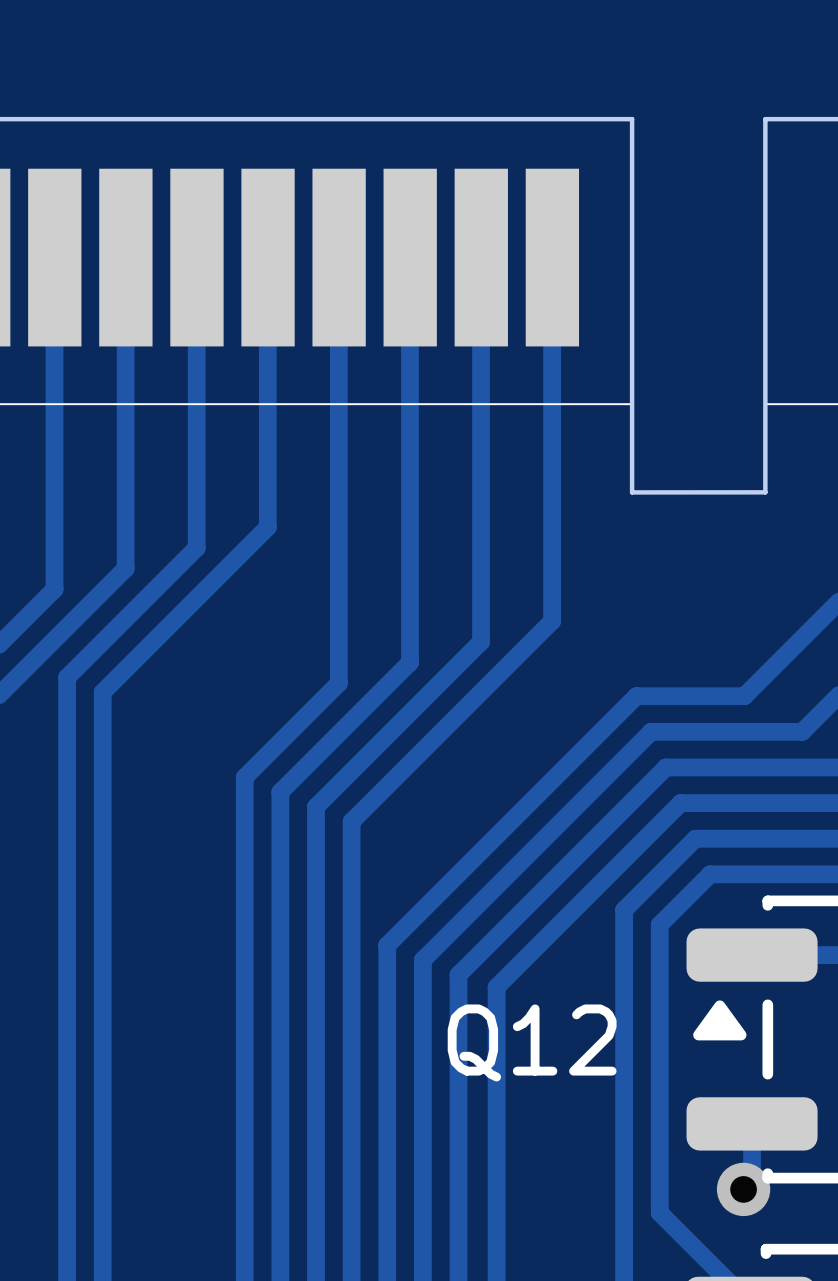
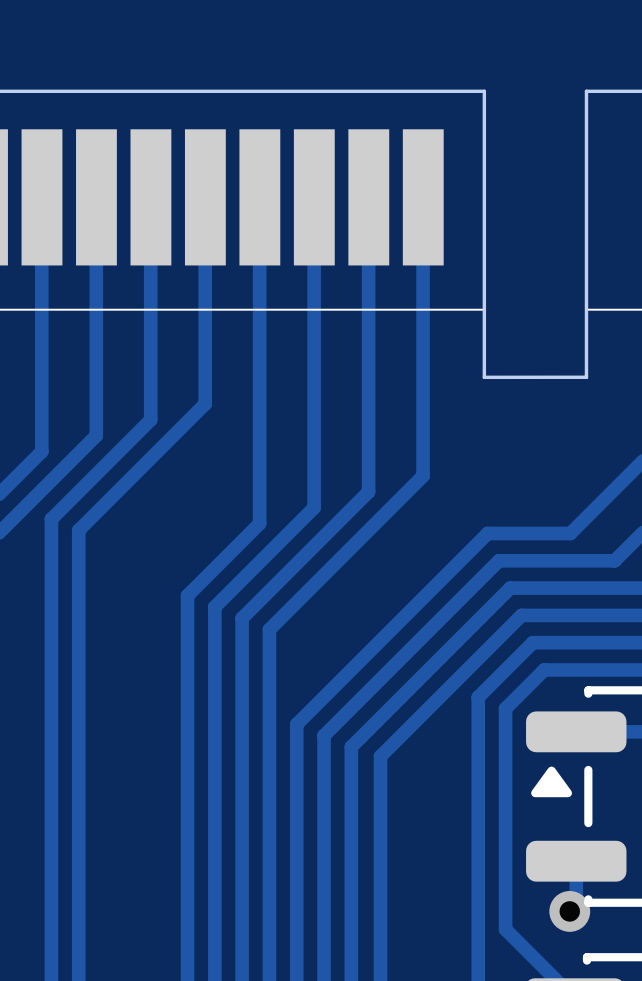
Q12 name: Q12 (532, 1042) -> none

